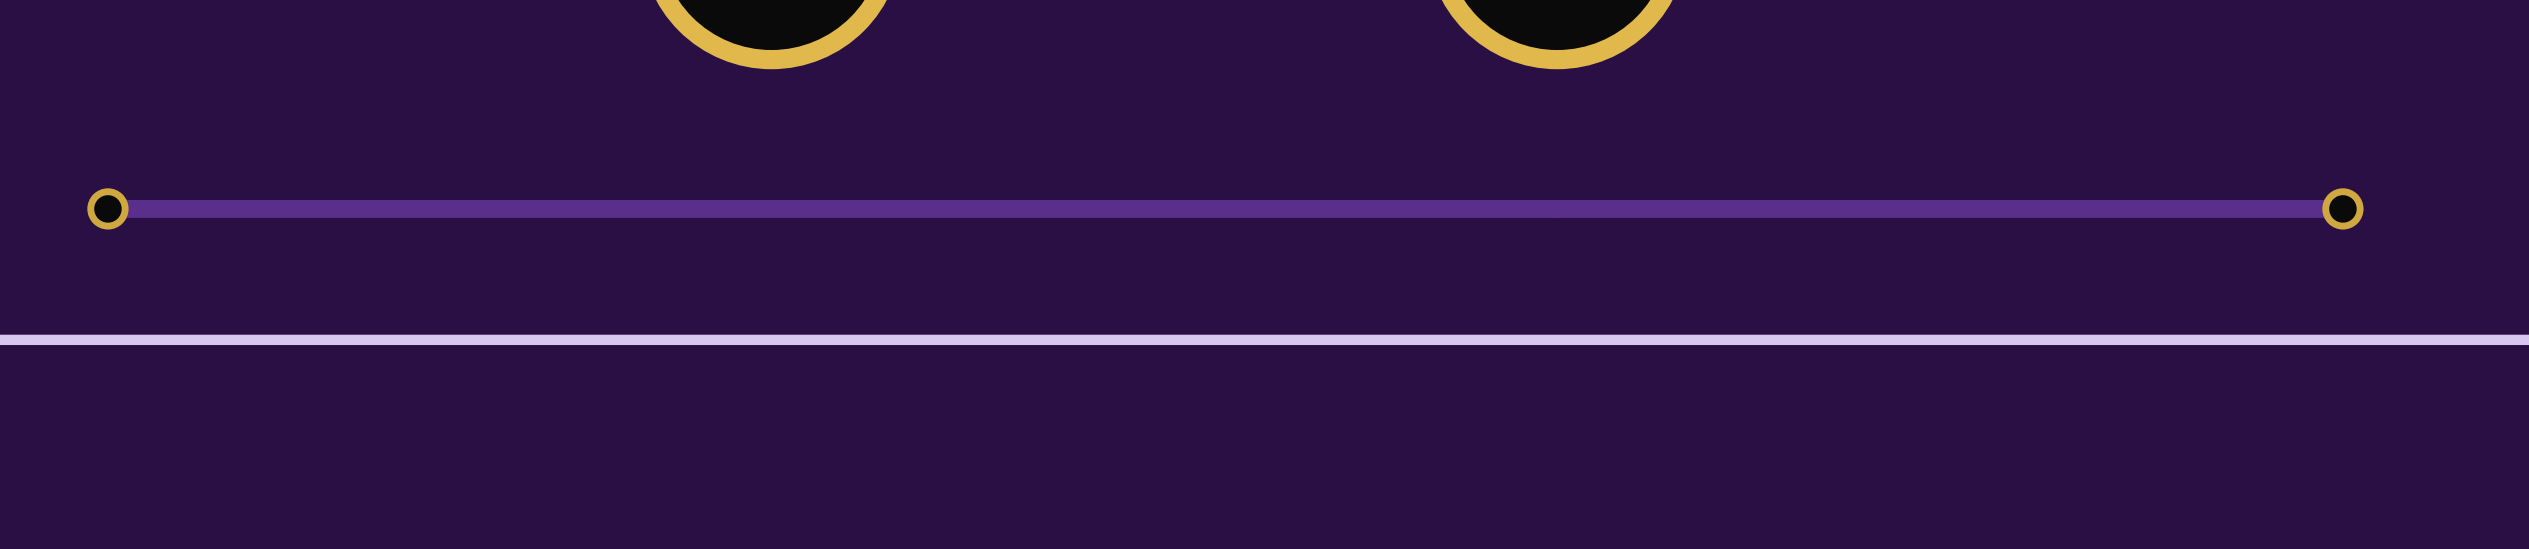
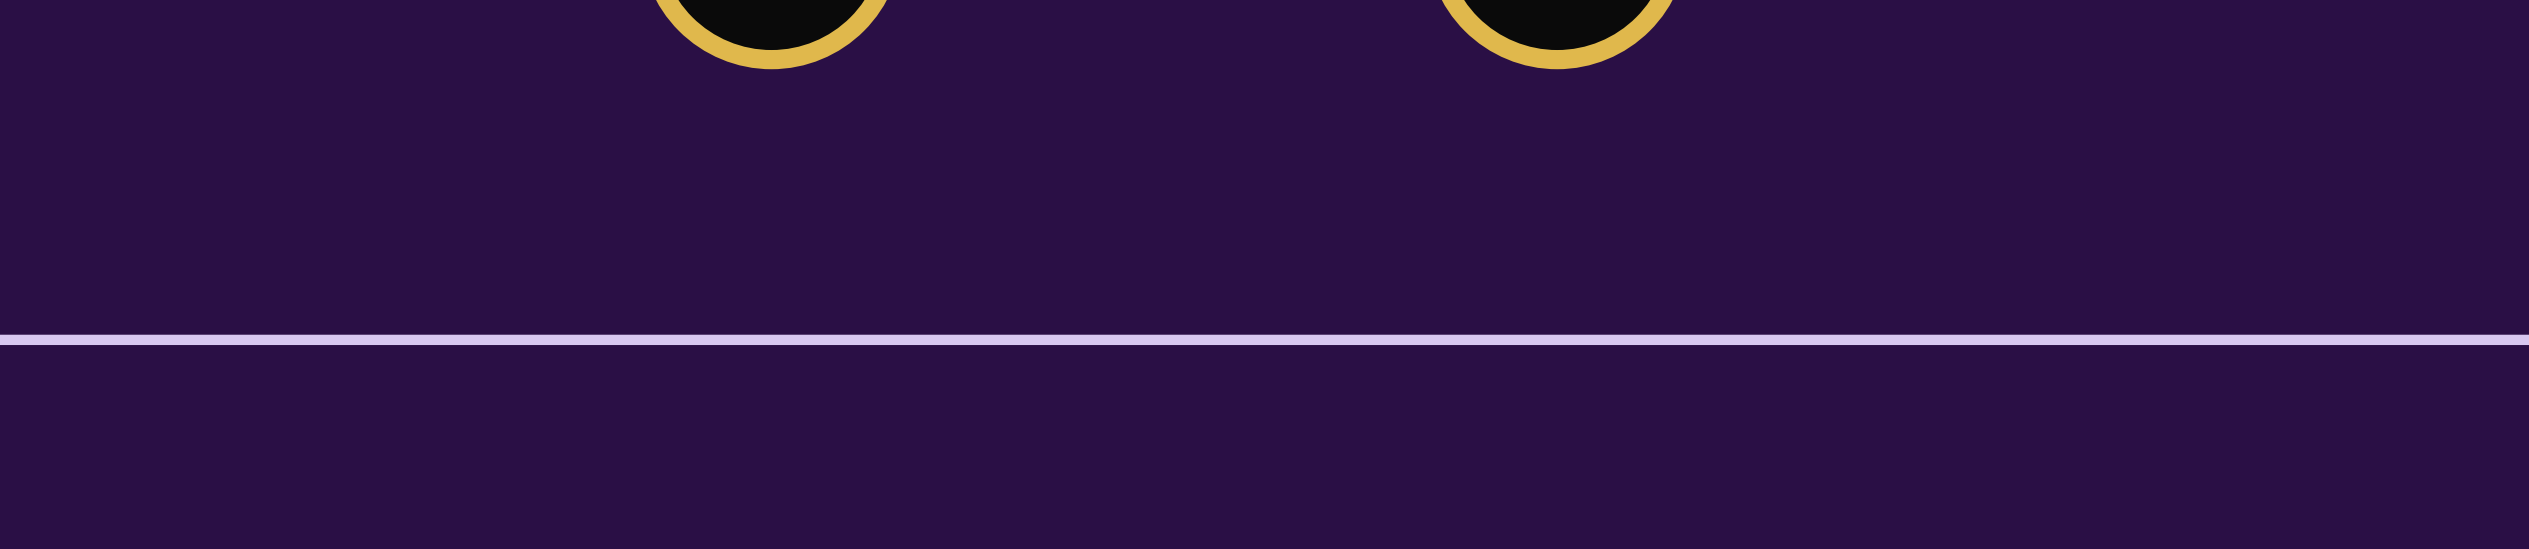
via: (107, 208) -> none
track: (2342, 208) (107, 208) -> none
via: (2342, 208) -> none

